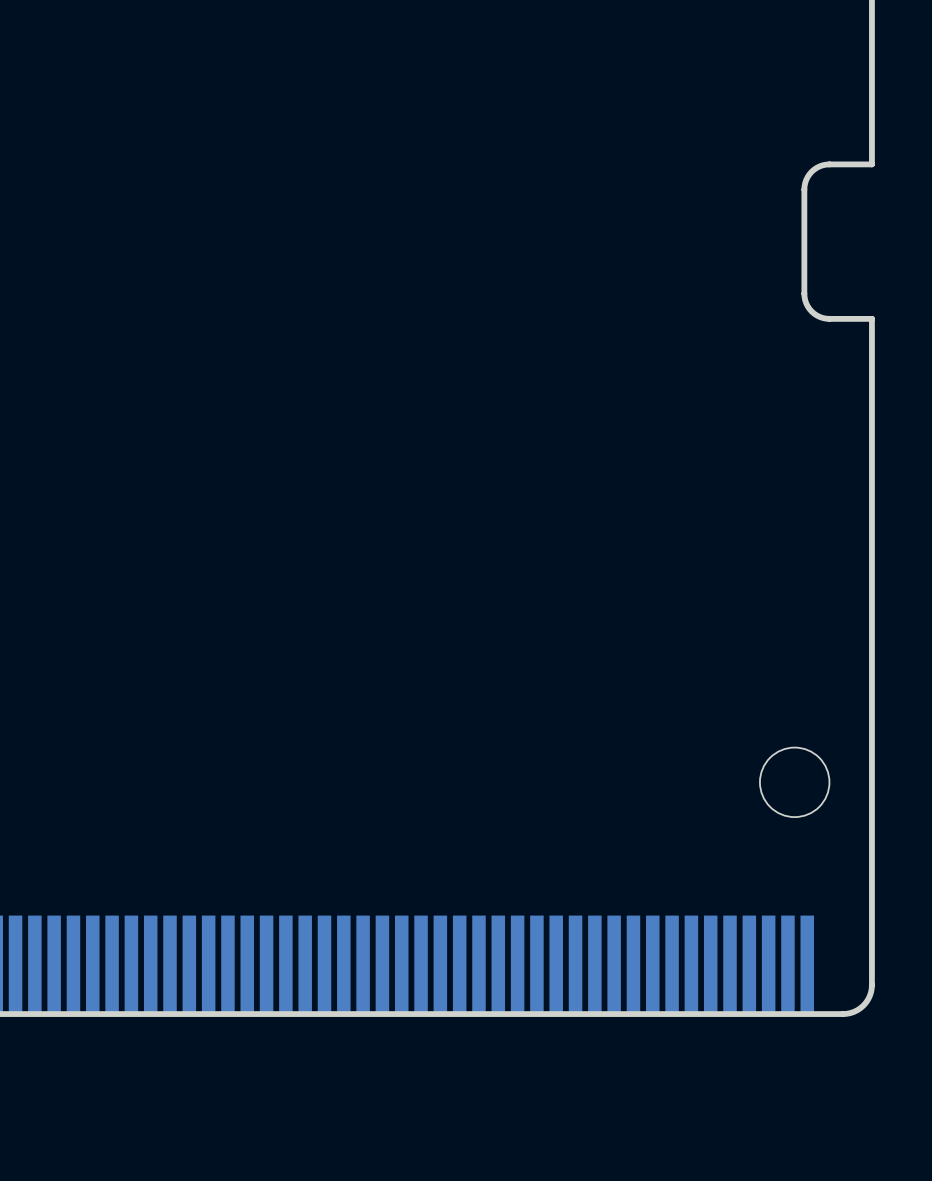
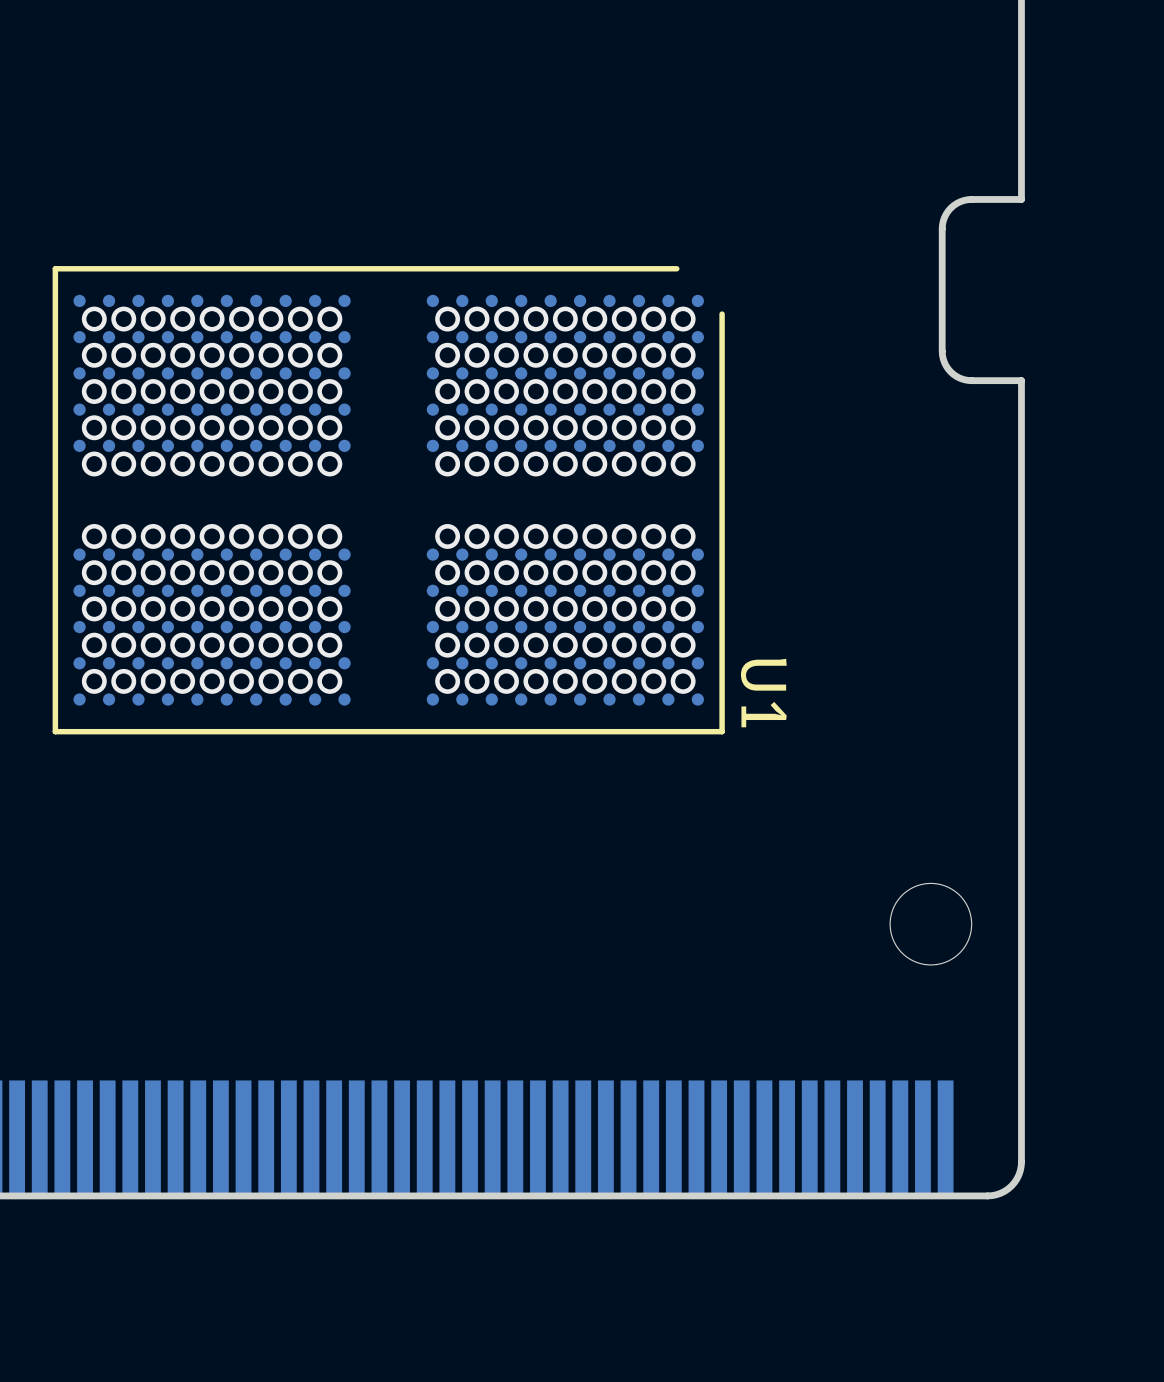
via: none -> (94, 319)
via: none -> (123, 319)
via: none -> (153, 319)
via: none -> (182, 319)
via: none -> (212, 319)
via: none -> (241, 319)
via: none -> (270, 319)
via: none -> (300, 319)
via: none -> (329, 319)
via: none -> (447, 319)
via: none -> (477, 319)
via: none -> (506, 319)
via: none -> (535, 319)
via: none -> (565, 319)
via: none -> (594, 319)
via: none -> (624, 319)
via: none -> (653, 319)
via: none -> (683, 319)
via: none -> (94, 355)
via: none -> (123, 355)
via: none -> (153, 355)
via: none -> (182, 355)
via: none -> (212, 355)
via: none -> (241, 355)
via: none -> (270, 355)
via: none -> (300, 355)
via: none -> (329, 355)
via: none -> (447, 355)
via: none -> (477, 355)
via: none -> (506, 355)
via: none -> (535, 355)
via: none -> (565, 355)
via: none -> (594, 355)
via: none -> (624, 355)
via: none -> (653, 355)
via: none -> (683, 355)
via: none -> (94, 391)
via: none -> (123, 391)
via: none -> (153, 391)
via: none -> (182, 391)
via: none -> (212, 391)
via: none -> (241, 391)
via: none -> (270, 391)
via: none -> (300, 391)
via: none -> (329, 391)
via: none -> (447, 391)
via: none -> (477, 391)
via: none -> (506, 391)
via: none -> (535, 391)
via: none -> (565, 391)
via: none -> (594, 391)
via: none -> (624, 391)
via: none -> (653, 391)
via: none -> (683, 391)
via: none -> (94, 427)
via: none -> (123, 427)
via: none -> (153, 427)
via: none -> (182, 427)
via: none -> (212, 427)
via: none -> (241, 427)
via: none -> (270, 427)
via: none -> (300, 427)
via: none -> (329, 427)
via: none -> (447, 427)
via: none -> (477, 427)
via: none -> (506, 427)
via: none -> (535, 427)
via: none -> (565, 427)
via: none -> (594, 427)
via: none -> (624, 427)
via: none -> (653, 427)
via: none -> (683, 427)
via: none -> (94, 463)
via: none -> (123, 463)
via: none -> (153, 463)
via: none -> (182, 463)
via: none -> (212, 463)
via: none -> (241, 463)
via: none -> (270, 463)
via: none -> (300, 463)
via: none -> (329, 463)
via: none -> (447, 463)
via: none -> (477, 463)
via: none -> (506, 463)
via: none -> (535, 463)
via: none -> (565, 463)
via: none -> (594, 463)
via: none -> (624, 463)
via: none -> (653, 463)
via: none -> (683, 463)
U1: none -> (388, 500)
via: none -> (94, 536)
via: none -> (123, 536)
via: none -> (153, 536)
via: none -> (182, 536)
via: none -> (212, 536)
via: none -> (241, 536)
via: none -> (270, 536)
via: none -> (300, 536)
via: none -> (329, 536)
via: none -> (447, 536)
via: none -> (477, 536)
via: none -> (506, 536)
via: none -> (535, 536)
via: none -> (565, 536)
via: none -> (594, 536)
via: none -> (624, 536)
via: none -> (653, 536)
via: none -> (683, 536)
via: none -> (94, 572)
via: none -> (123, 572)
via: none -> (153, 572)
via: none -> (182, 572)
via: none -> (212, 572)
via: none -> (241, 572)
via: none -> (270, 572)
via: none -> (300, 572)
via: none -> (329, 572)
via: none -> (447, 572)
via: none -> (477, 572)
via: none -> (506, 572)
via: none -> (535, 572)
via: none -> (565, 572)
via: none -> (594, 572)
via: none -> (624, 572)
via: none -> (653, 572)
via: none -> (683, 572)
via: none -> (94, 608)
via: none -> (123, 608)
via: none -> (153, 608)
via: none -> (182, 608)
via: none -> (212, 608)
via: none -> (241, 608)
via: none -> (270, 608)
via: none -> (300, 608)
via: none -> (329, 608)
via: none -> (447, 608)
via: none -> (477, 608)
via: none -> (506, 608)
via: none -> (535, 608)
via: none -> (565, 608)
via: none -> (594, 608)
via: none -> (624, 608)
via: none -> (653, 608)
via: none -> (683, 608)
via: none -> (94, 645)
via: none -> (123, 645)
via: none -> (153, 645)
via: none -> (182, 645)
via: none -> (212, 645)
via: none -> (241, 645)
via: none -> (270, 645)
via: none -> (300, 645)
via: none -> (329, 645)
via: none -> (447, 645)
via: none -> (477, 645)
via: none -> (506, 645)
via: none -> (535, 645)
via: none -> (565, 645)
via: none -> (594, 645)
via: none -> (624, 645)
via: none -> (653, 645)
via: none -> (683, 645)
via: none -> (94, 681)
via: none -> (123, 681)
via: none -> (153, 681)
via: none -> (182, 681)
via: none -> (212, 681)
via: none -> (241, 681)
via: none -> (270, 681)
via: none -> (300, 681)
via: none -> (329, 681)
via: none -> (447, 681)
via: none -> (477, 681)
via: none -> (506, 681)
via: none -> (535, 681)
via: none -> (565, 681)
via: none -> (594, 681)
via: none -> (624, 681)
via: none -> (653, 681)
via: none -> (683, 681)

